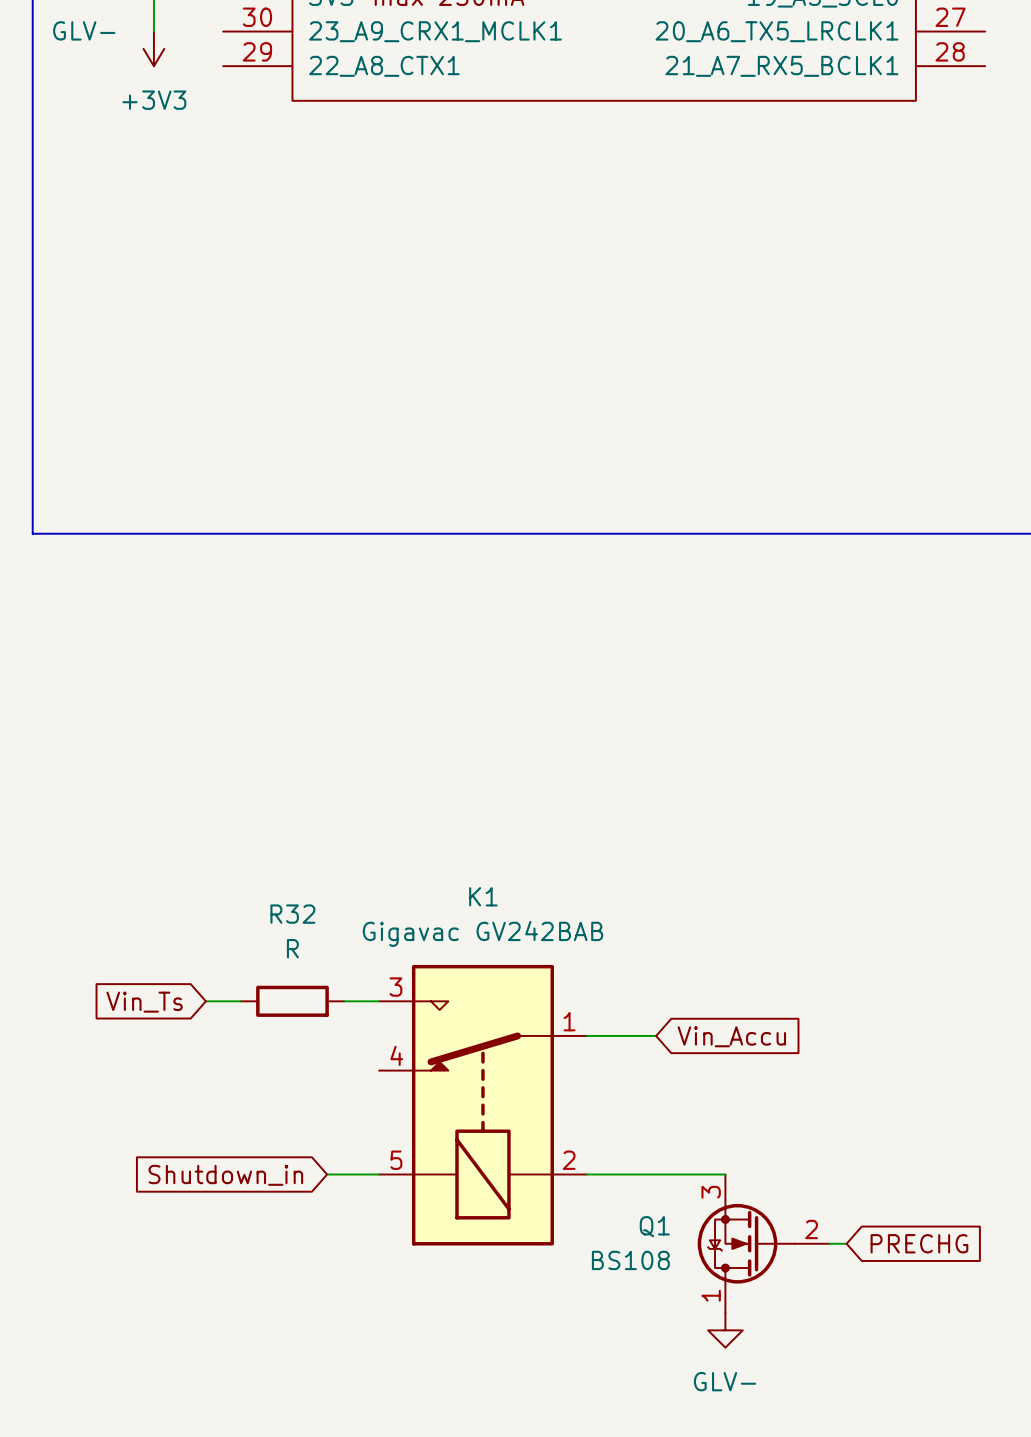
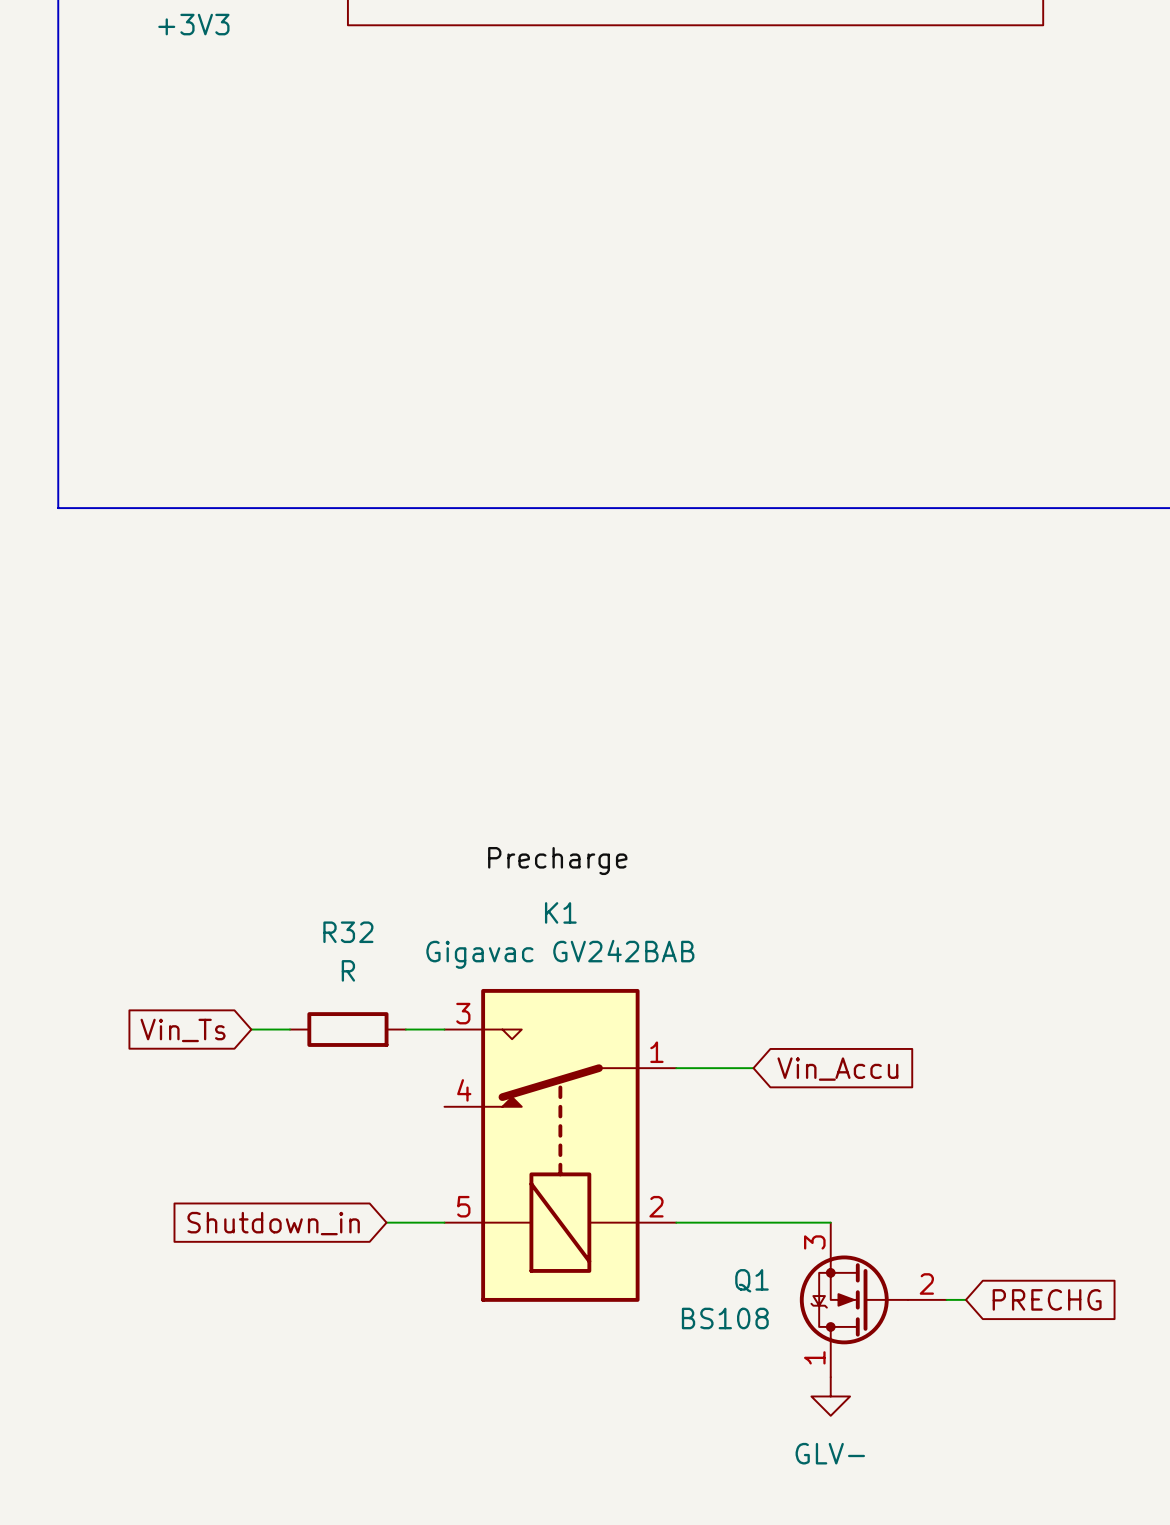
label: none -> Precharge (557, 861)

